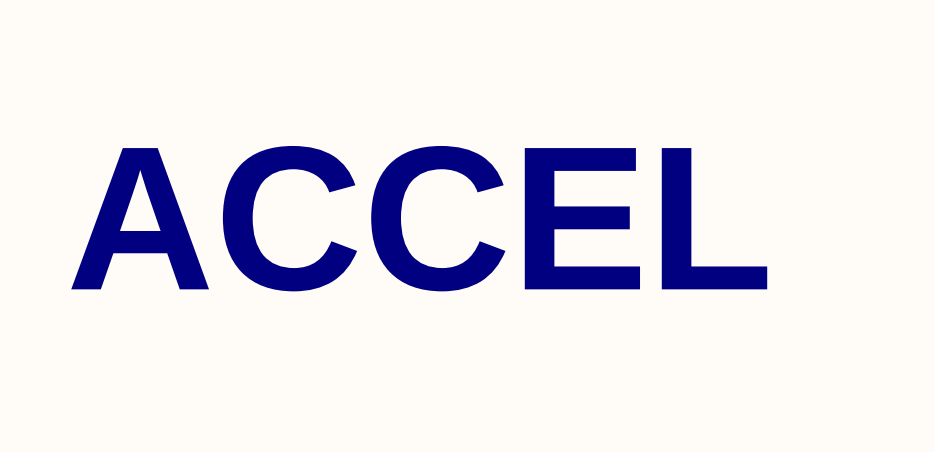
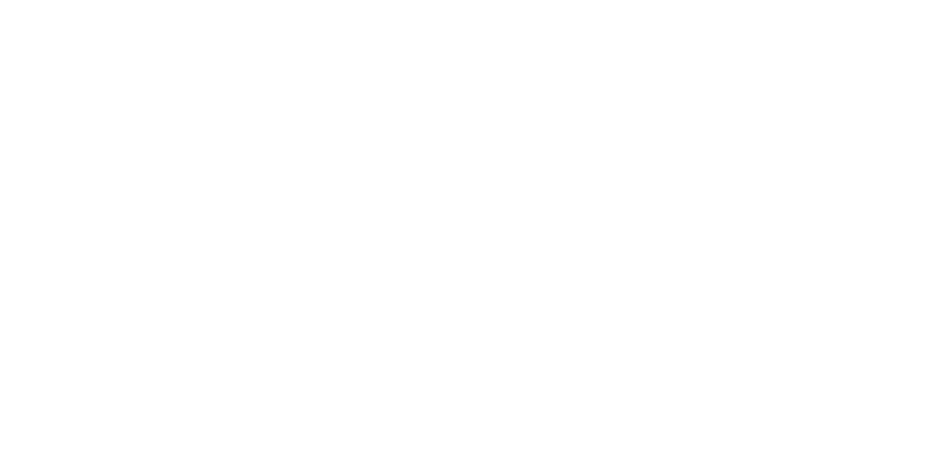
text: ACCEL (419, 218) -> none

